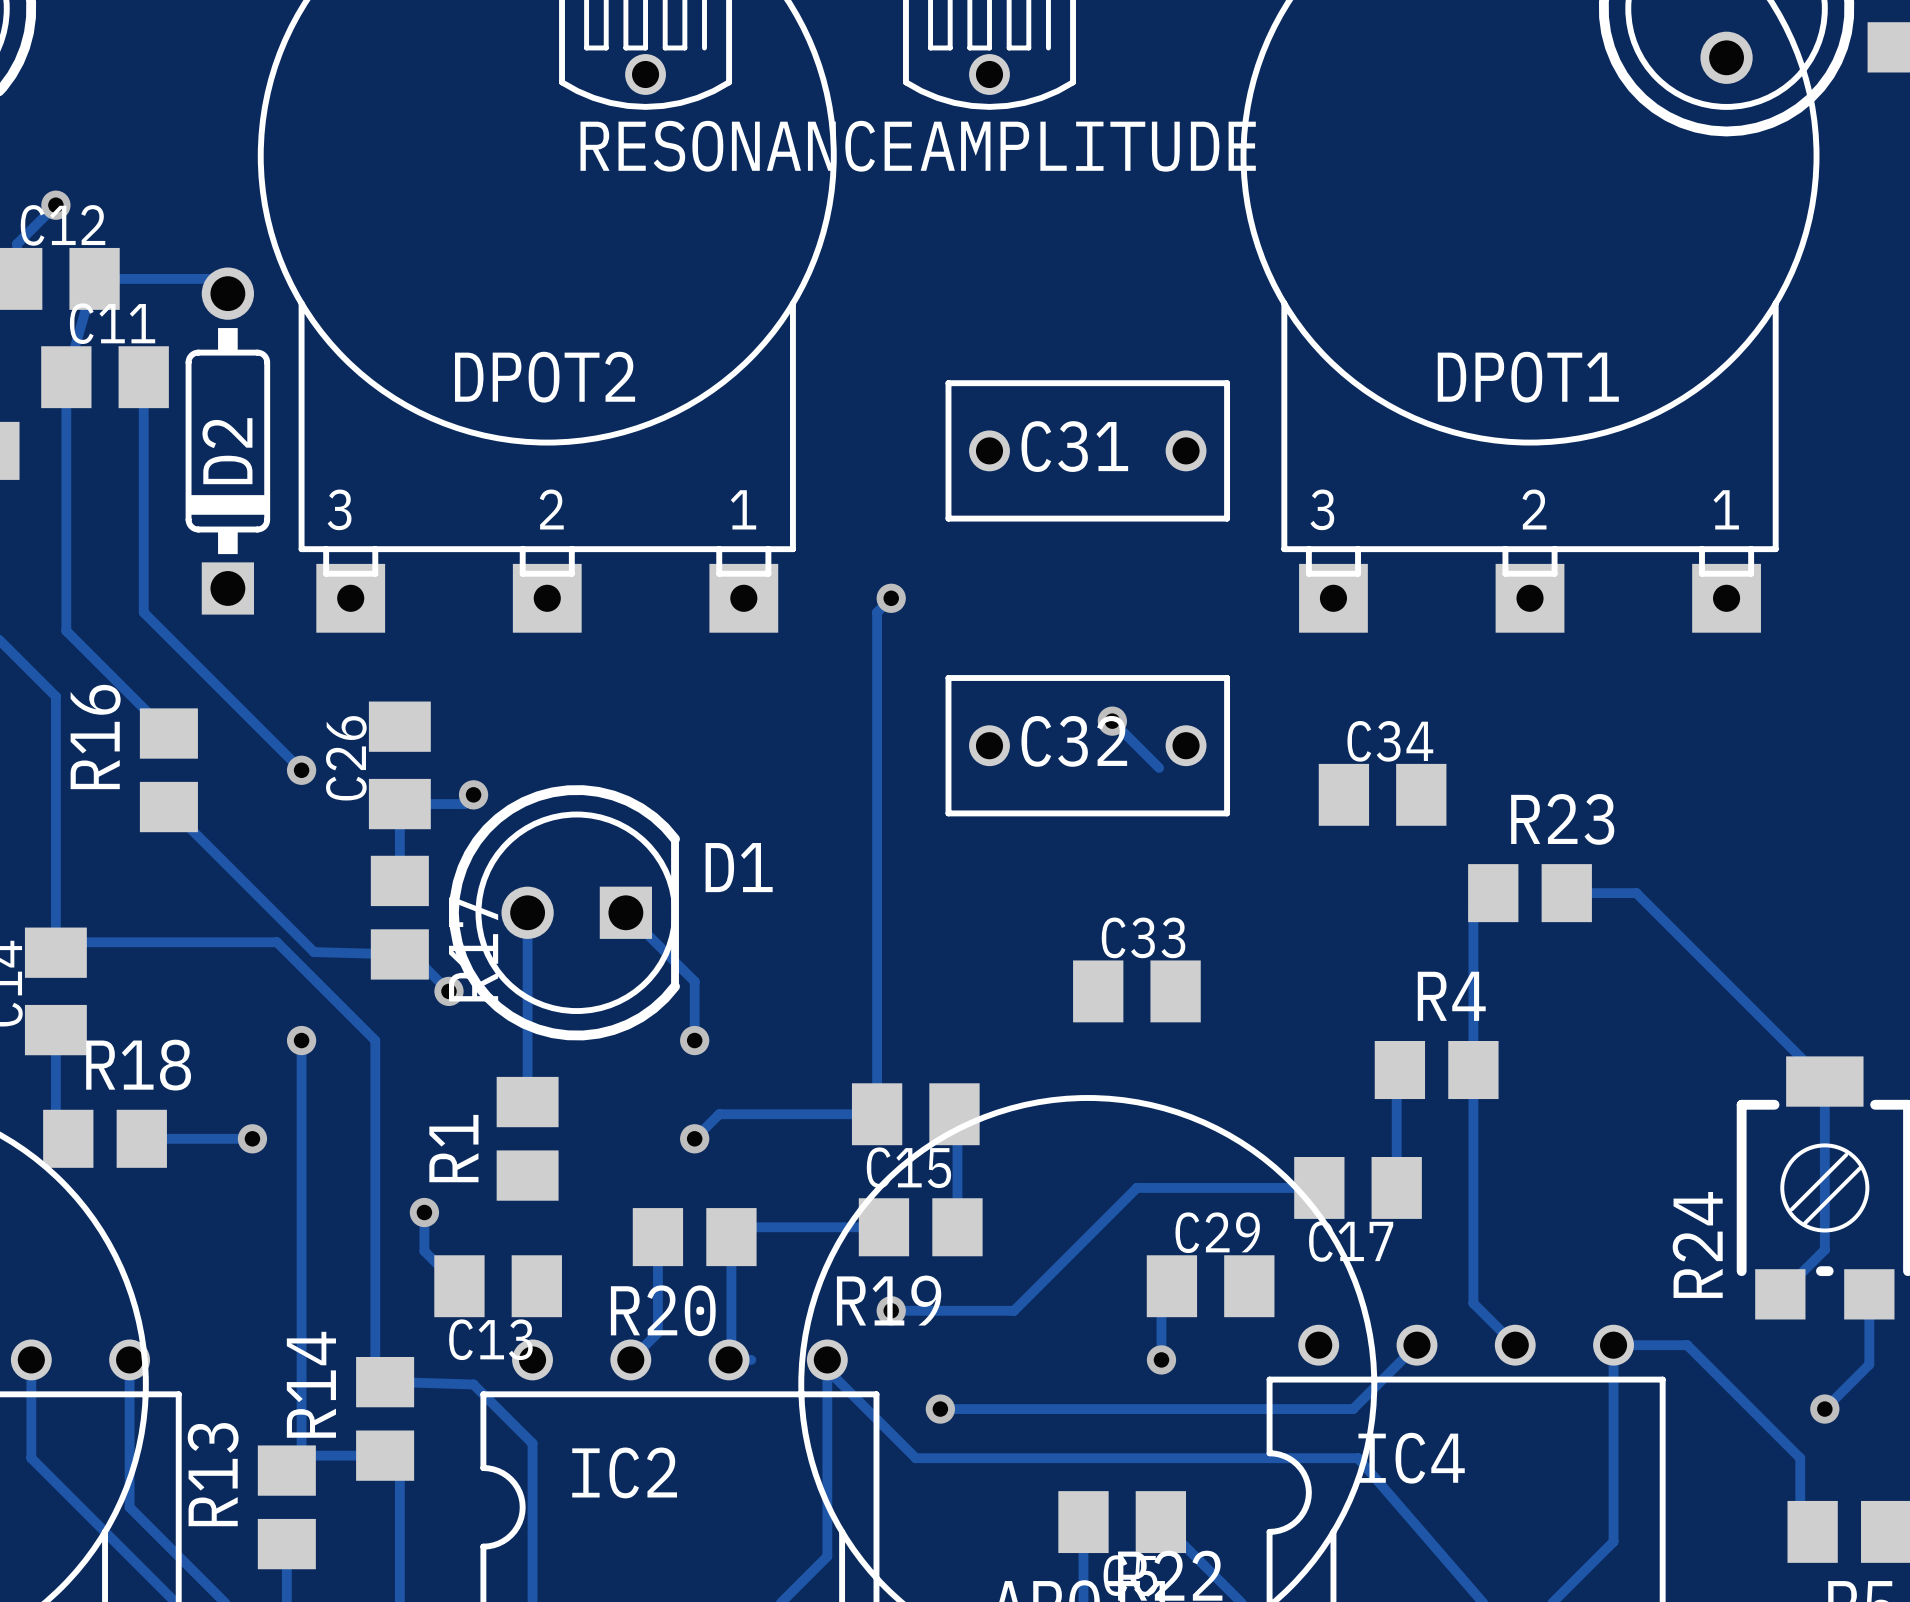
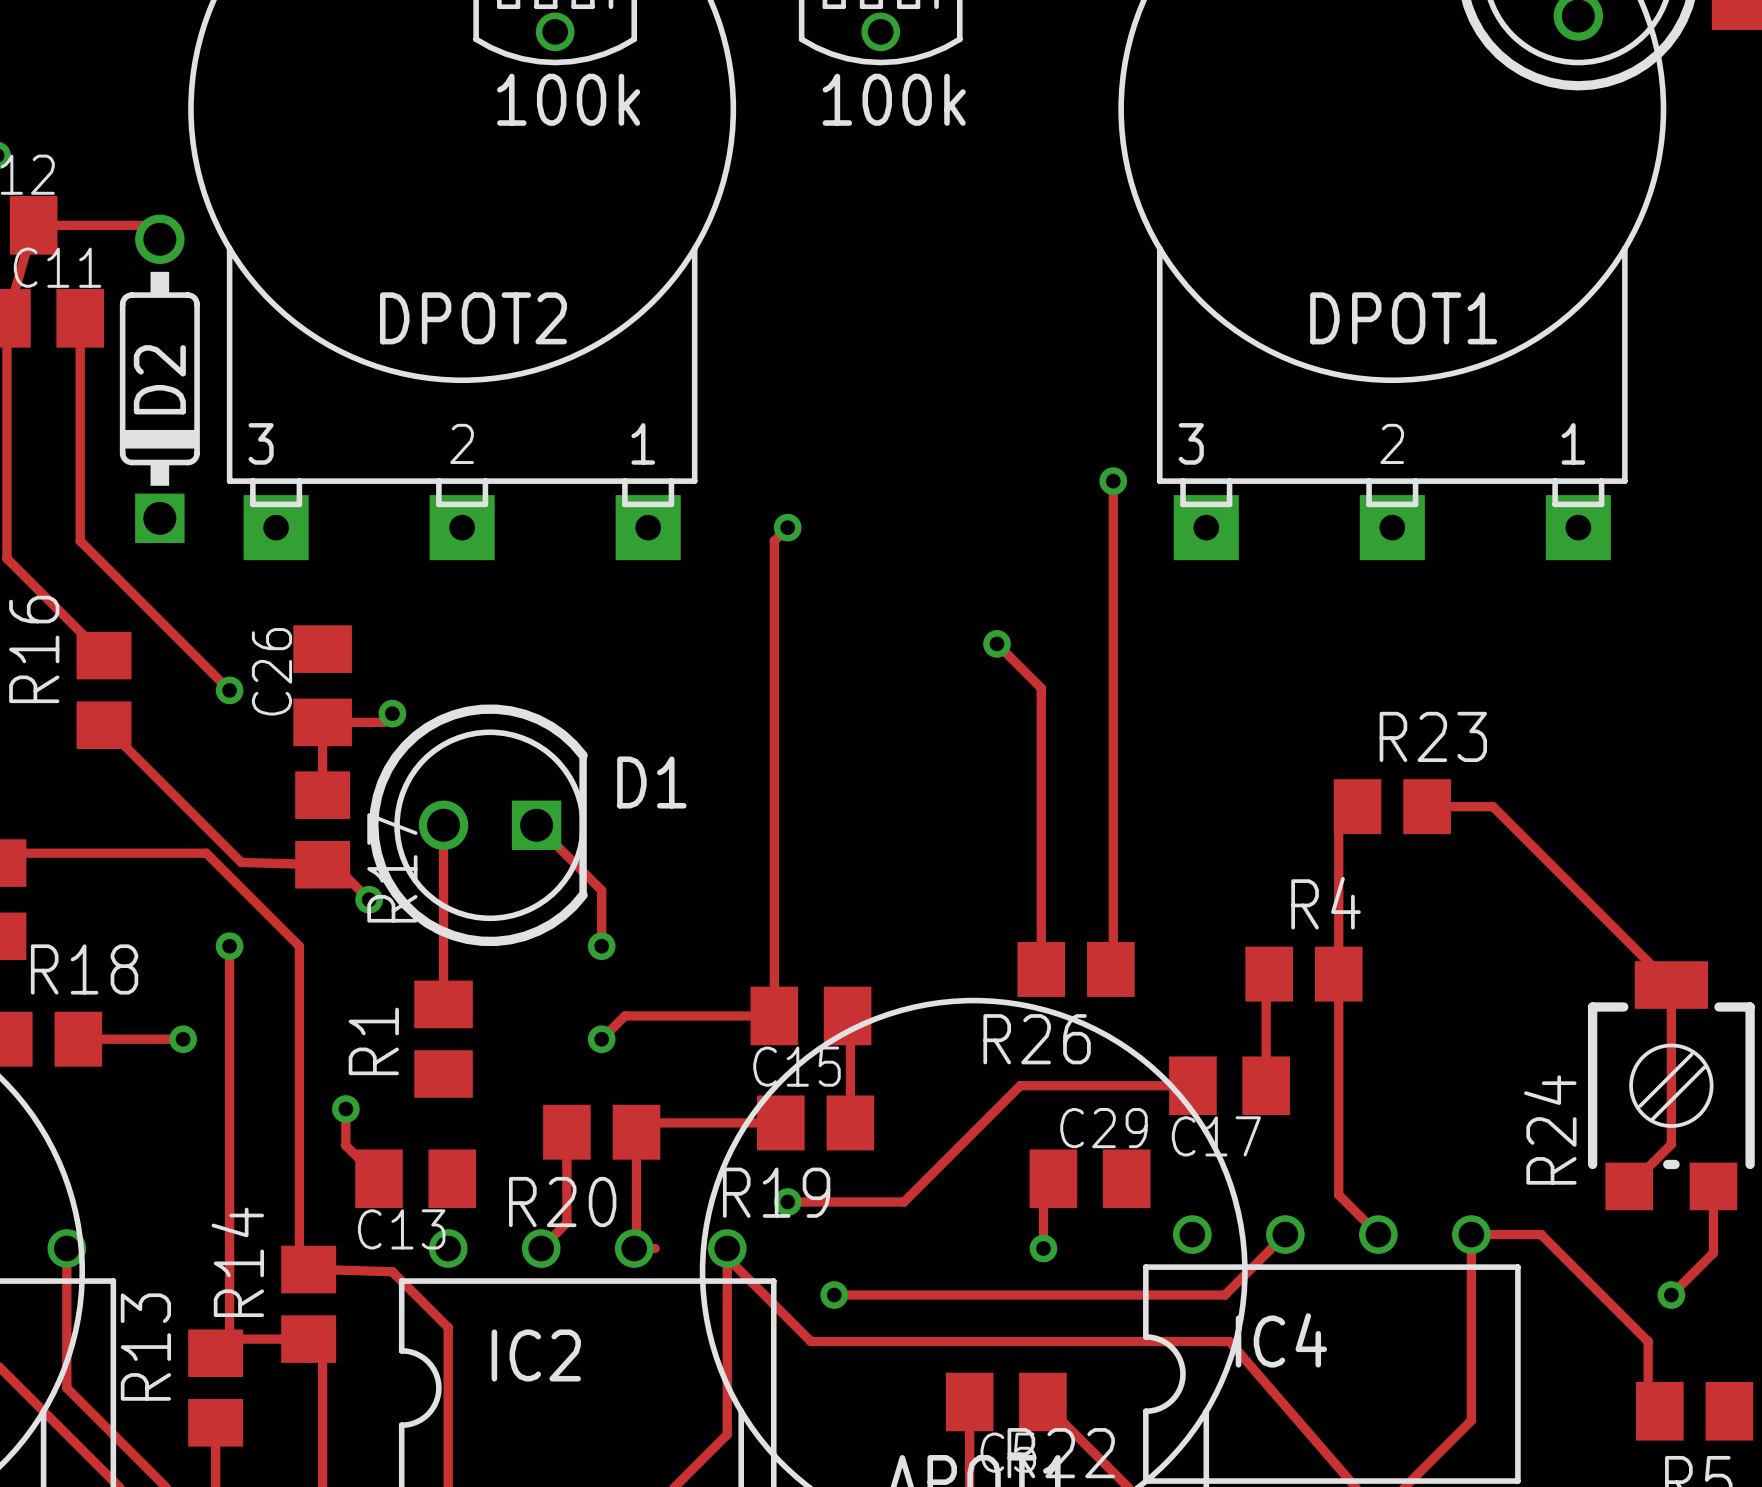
part value: RESONANCE (746, 146) -> 100k (568, 99)
part value: AMPLITUDE (1088, 146) -> 100k (894, 99)
C31: (1087, 450) -> none
track: none -> (1113, 481) (1113, 967) (1110, 969)
via: none -> (1113, 481)
C32: (1087, 745) -> none
track: none -> (1041, 688) (1041, 969)
C34: (1382, 794) -> none
C33: (1136, 991) -> none
R26: none -> (1076, 969)

